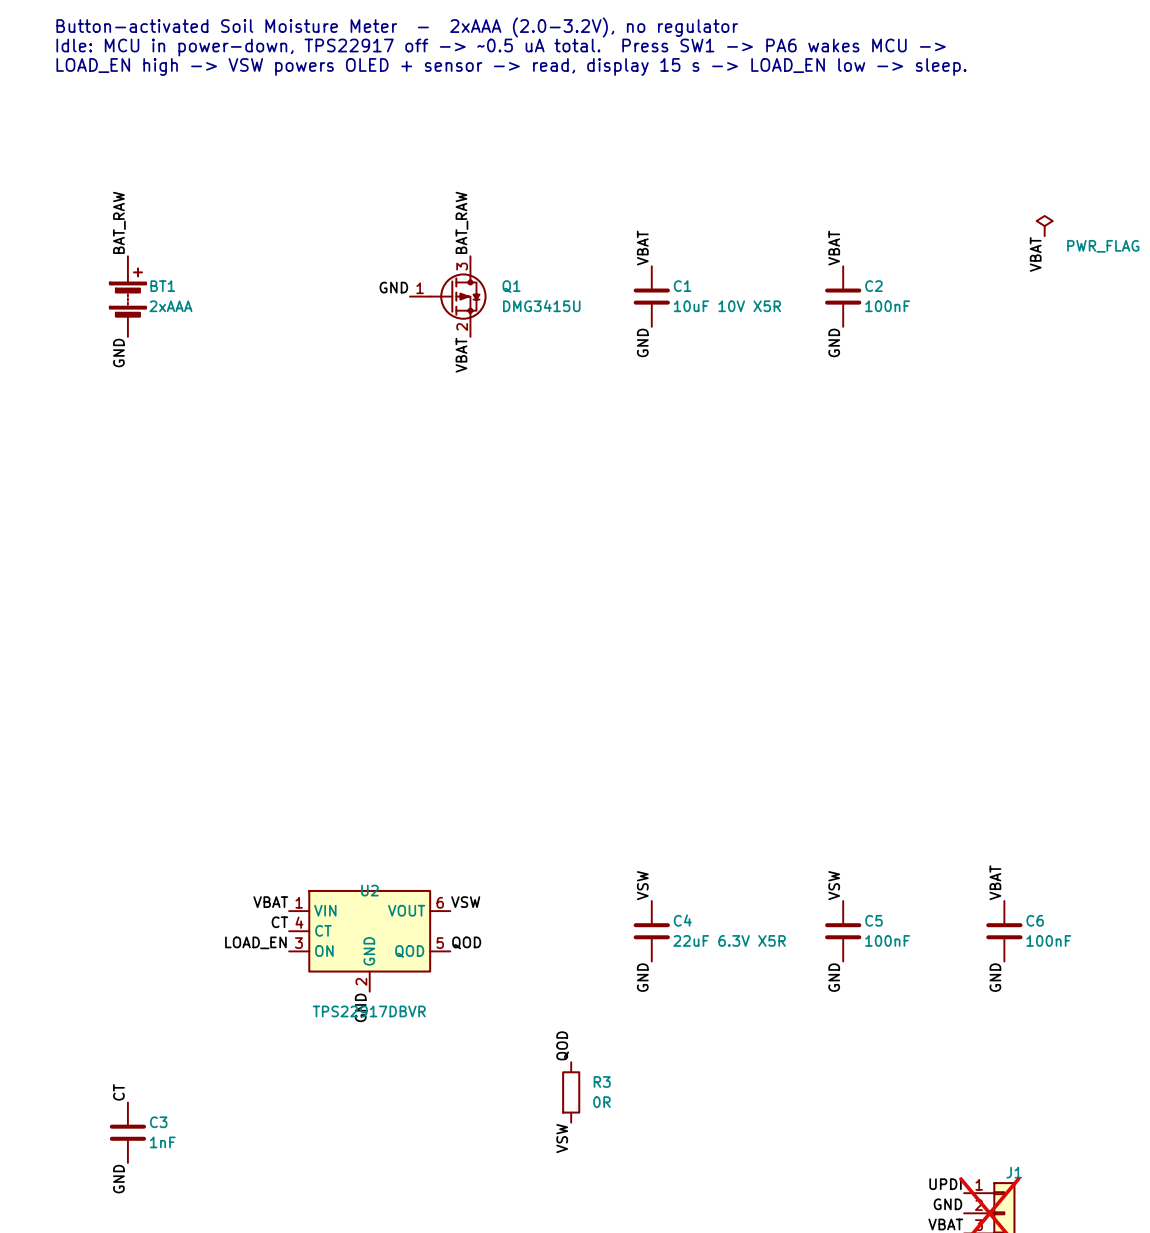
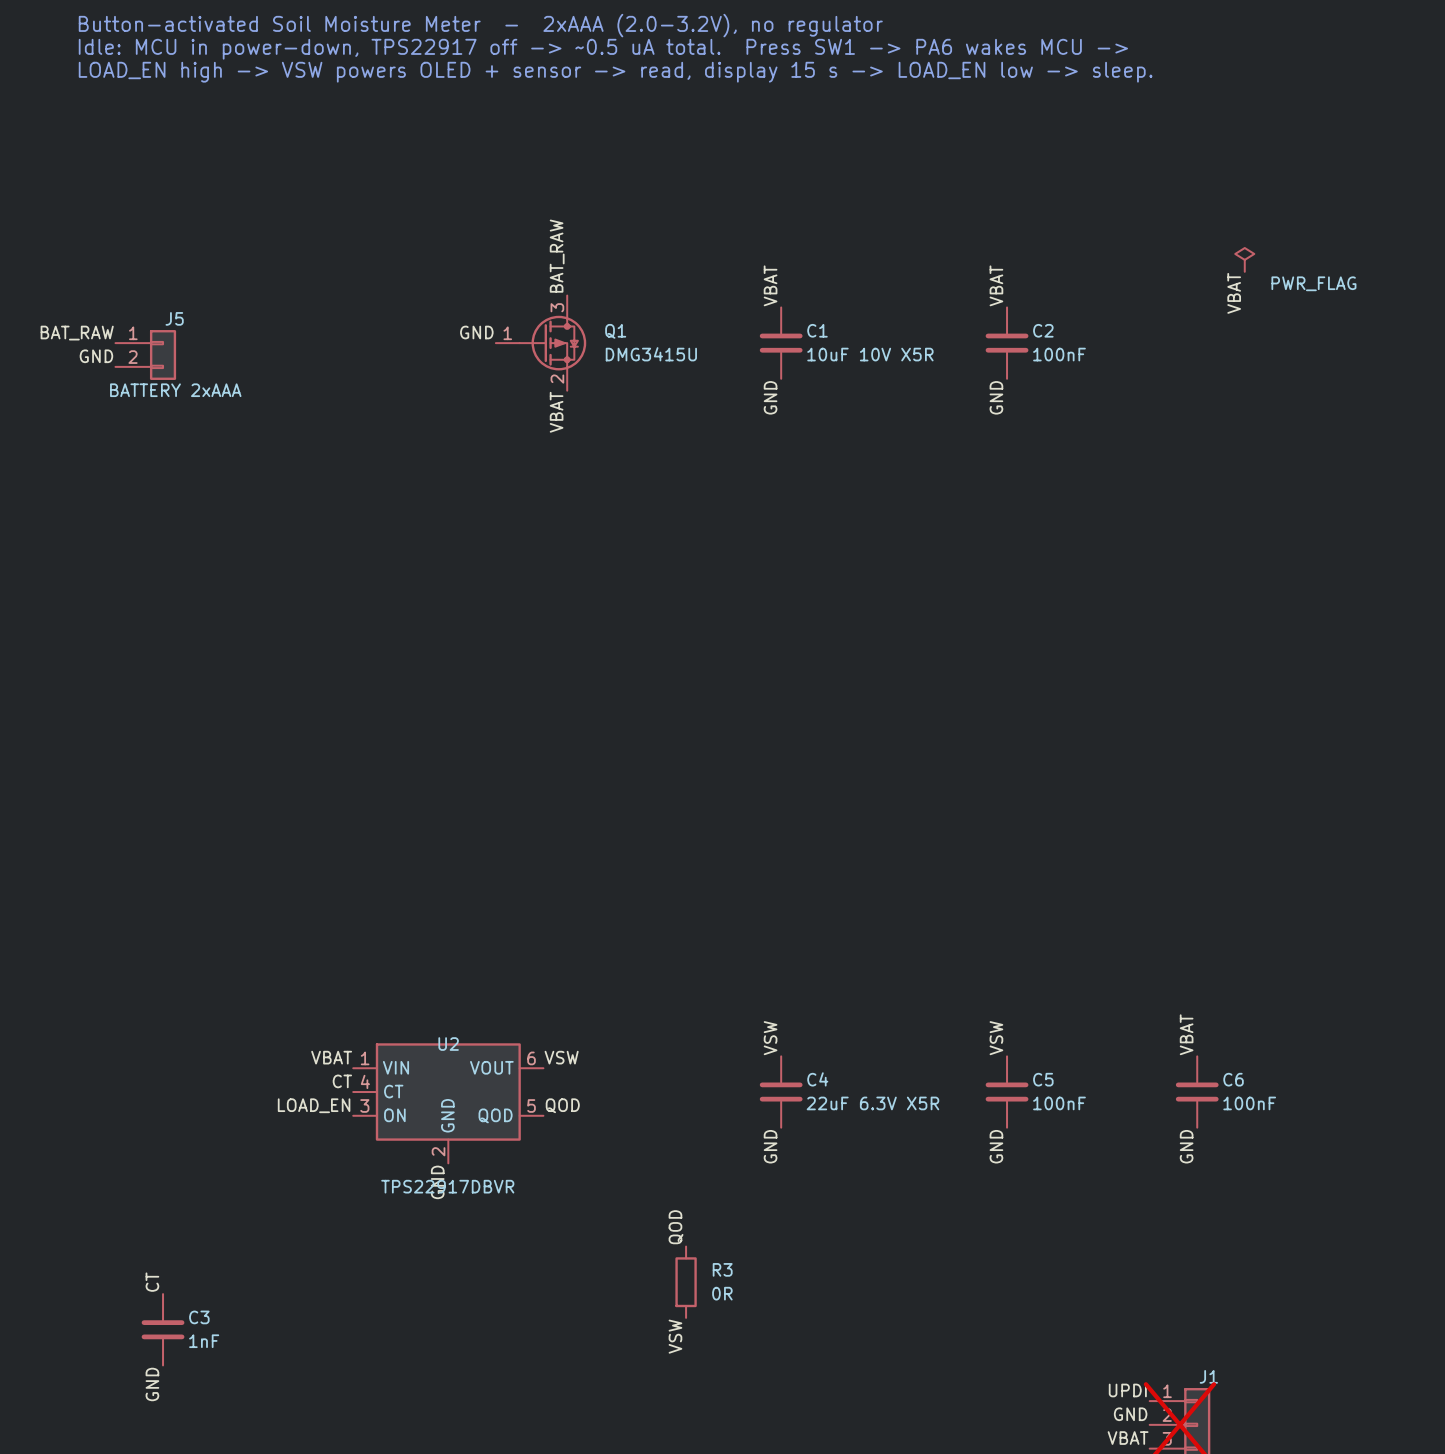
label rotation: 0° (119, 222) -> 90° clockwise (77, 333)
label position: BAT_RAW (119, 222) -> BAT_RAW (77, 333)
BT1: 2xAAA (127, 296) -> none
J5: none -> BATTERY 2xAAA (145, 355)
label rotation: 0° (118, 353) -> 90° clockwise (96, 356)
label position: GND (118, 353) -> GND (96, 356)

